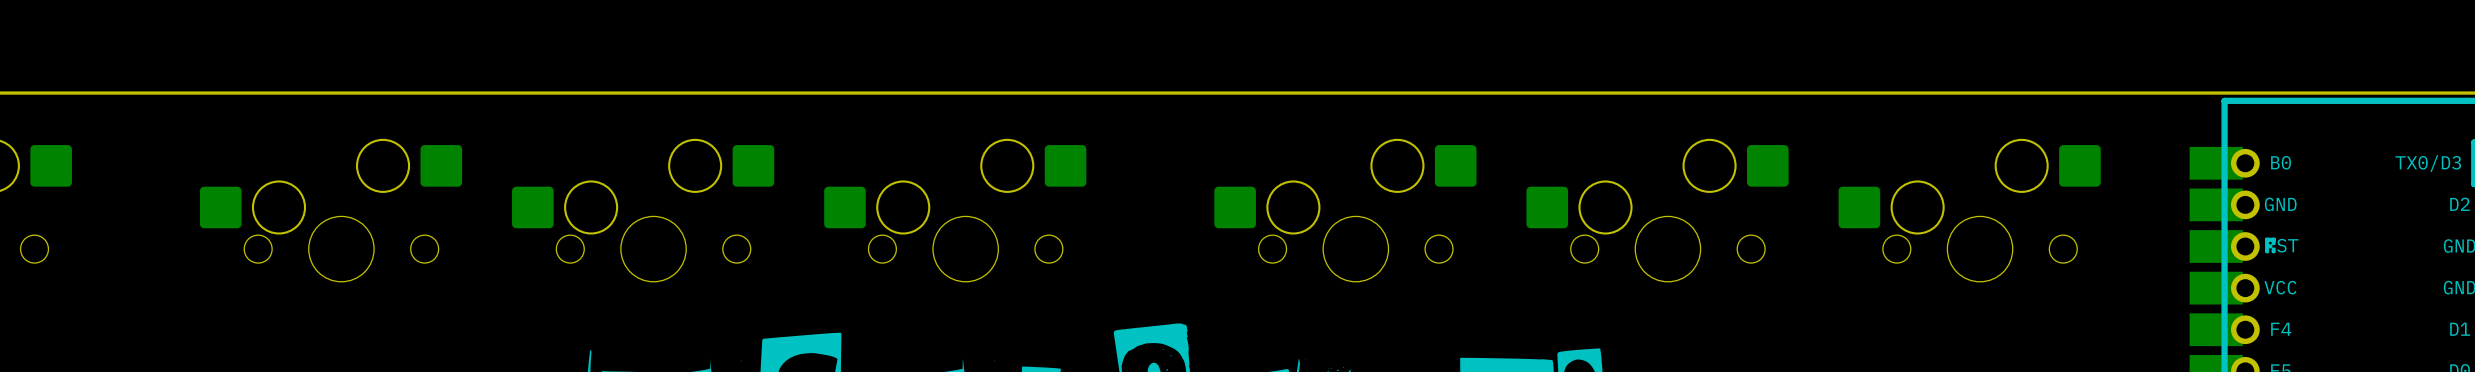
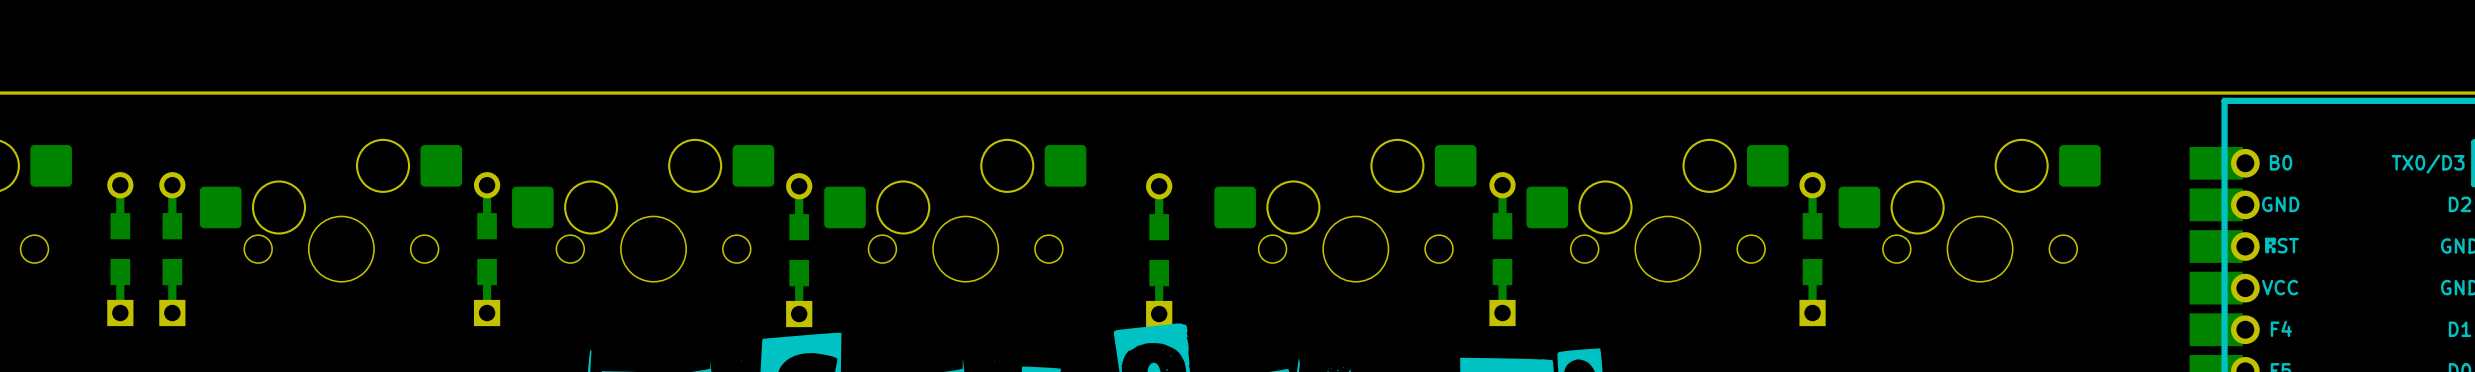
part: none -> (120, 249)
part: none -> (172, 249)
part: none -> (487, 249)
part: none -> (1502, 249)
part: none -> (1812, 249)
part: none -> (799, 250)
part: none -> (1159, 250)

